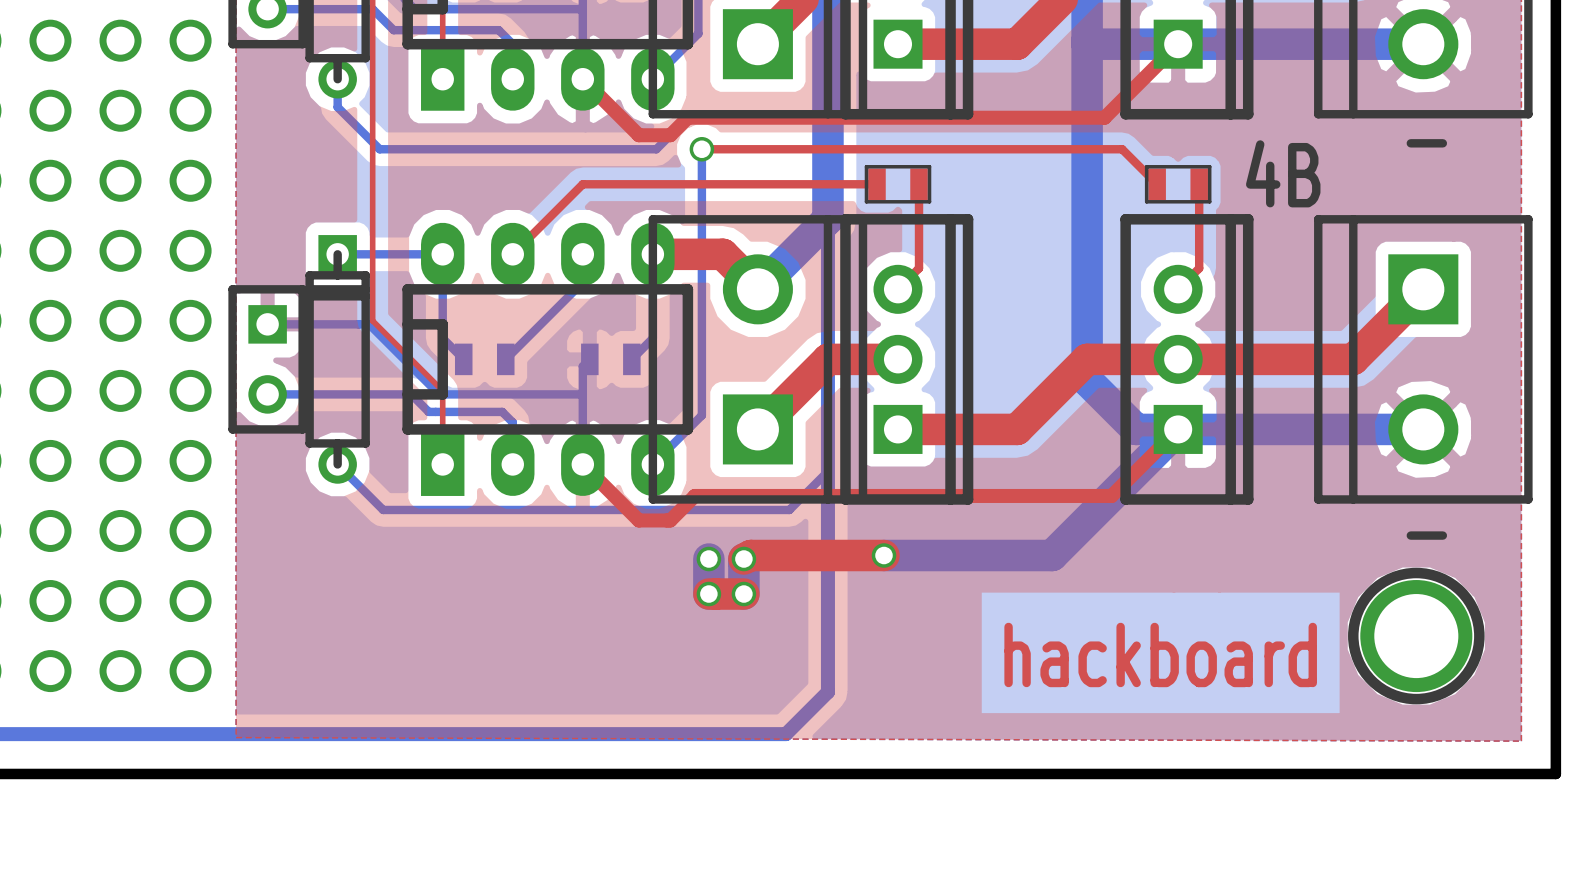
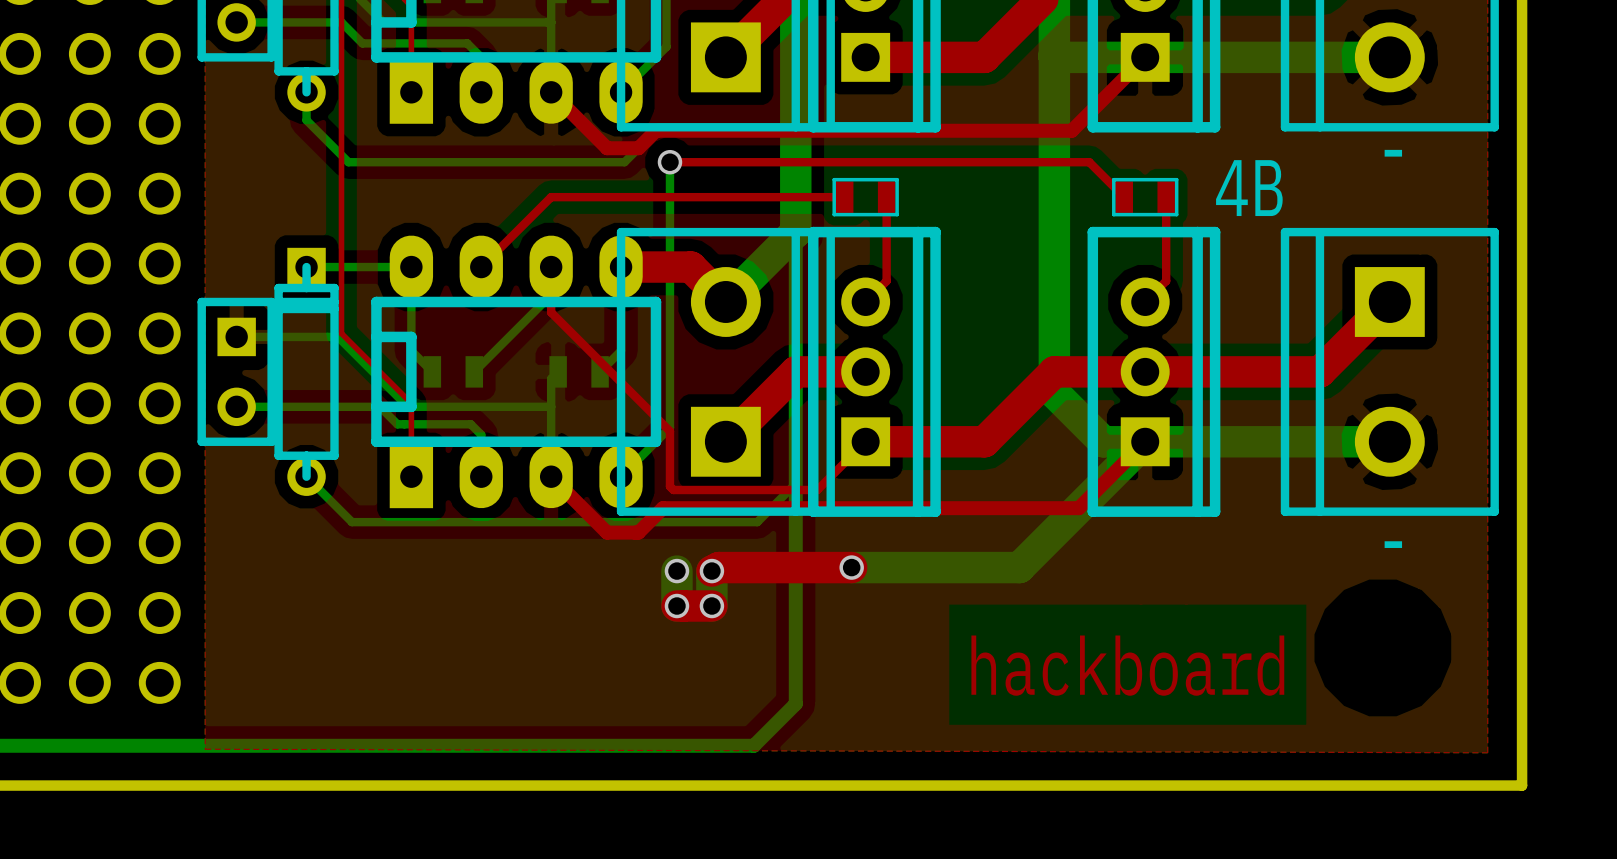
top track: none -> (551, 267) (551, 312) (669, 431) (669, 486) (673, 489) (817, 489) (865, 441)
part: (1416, 636) -> none

